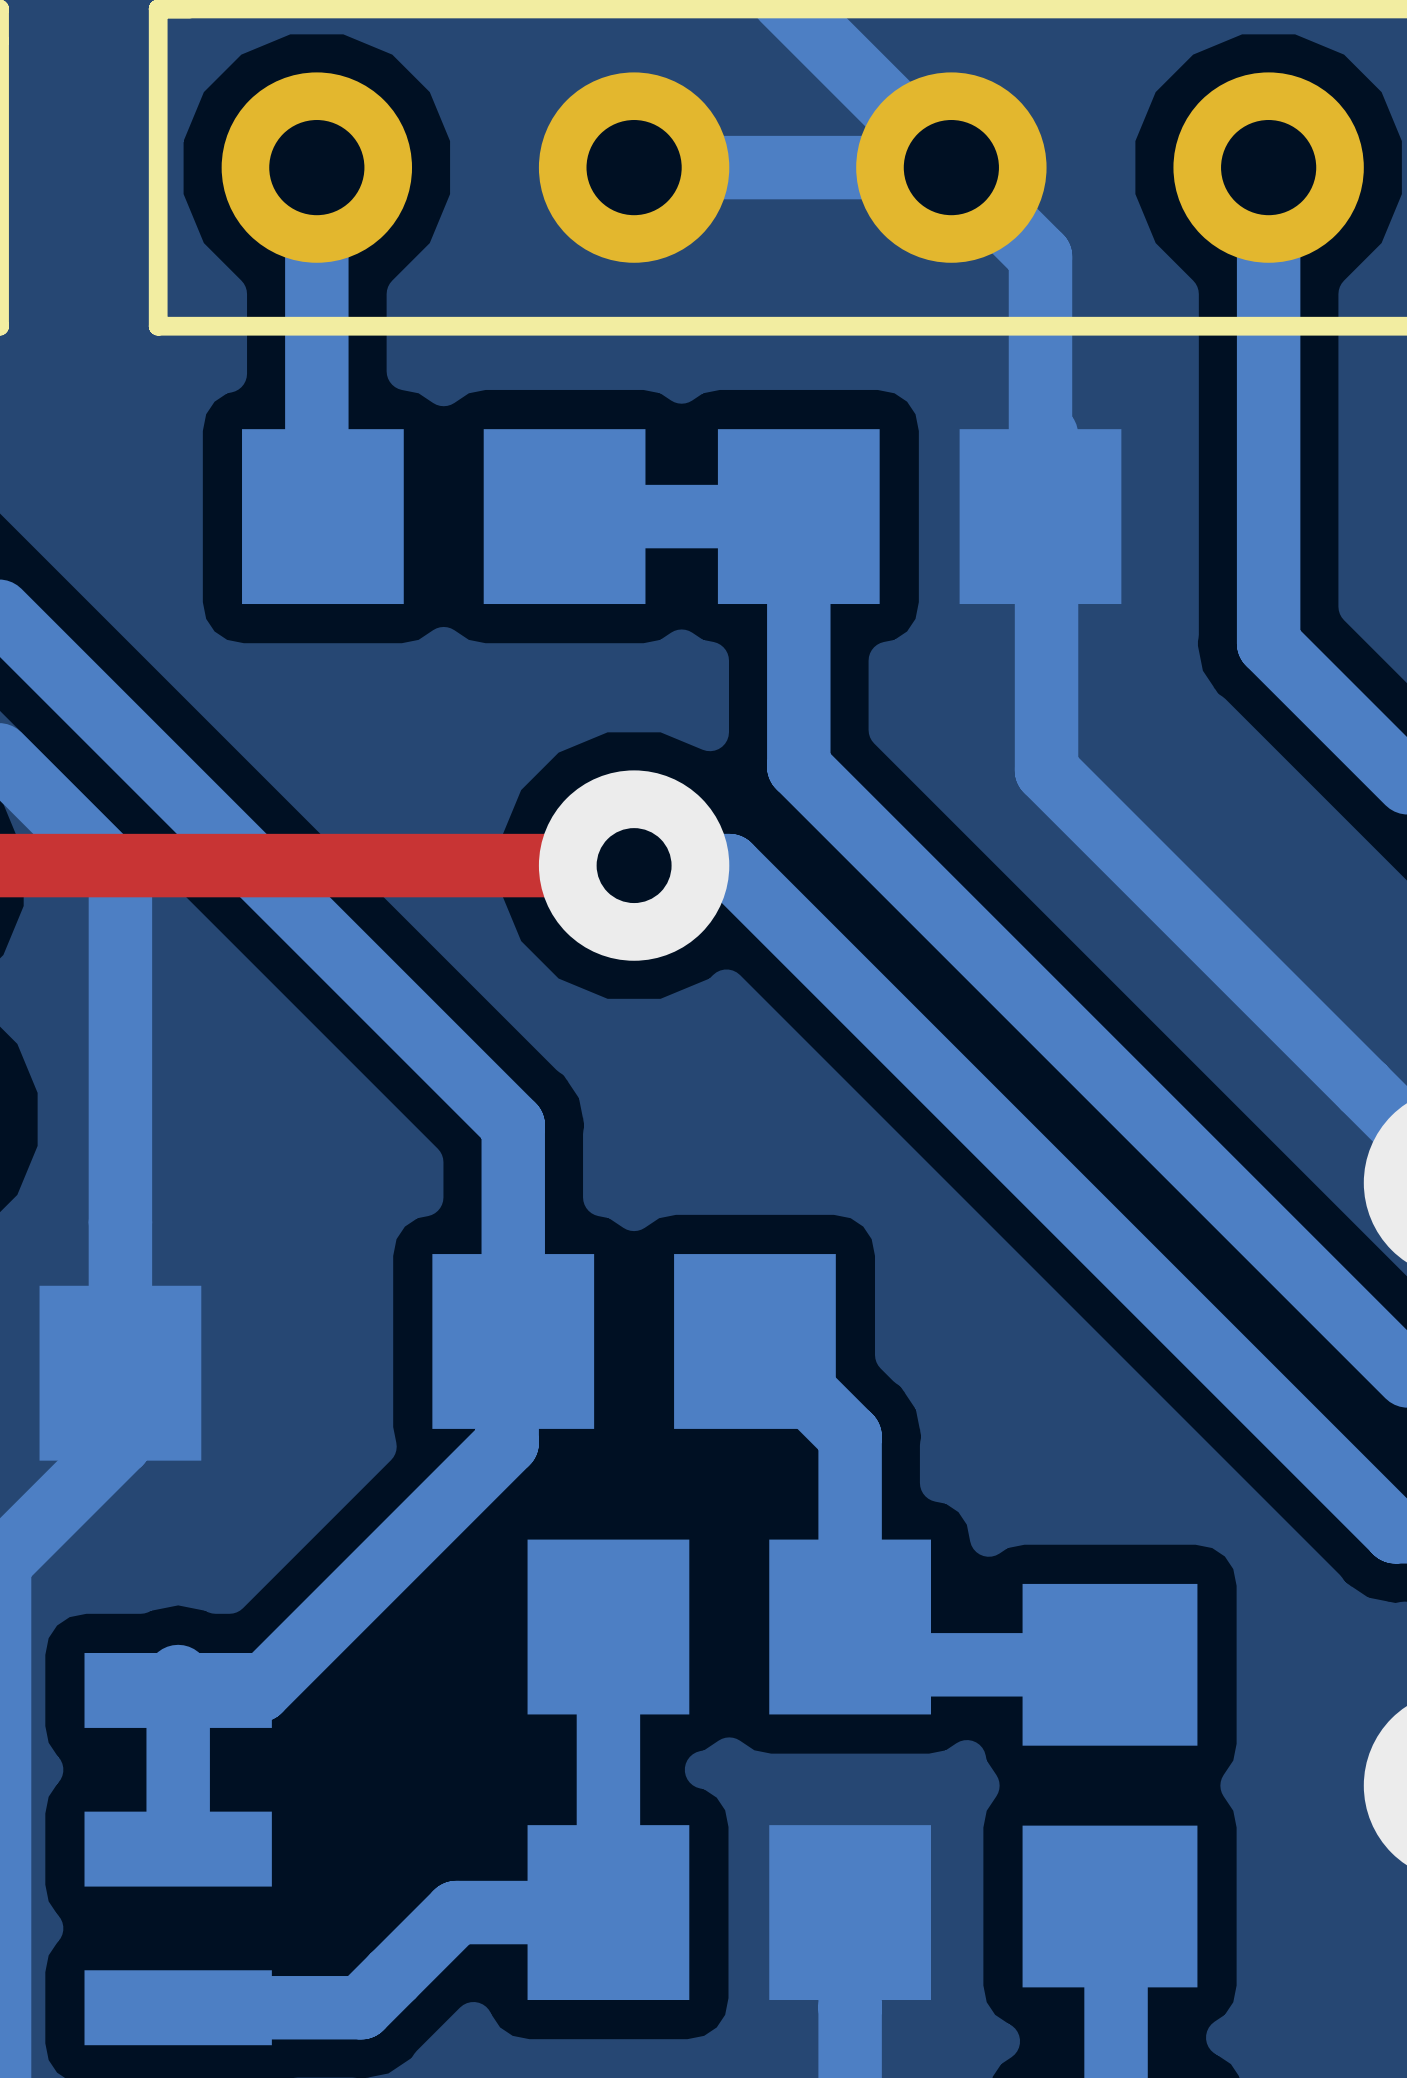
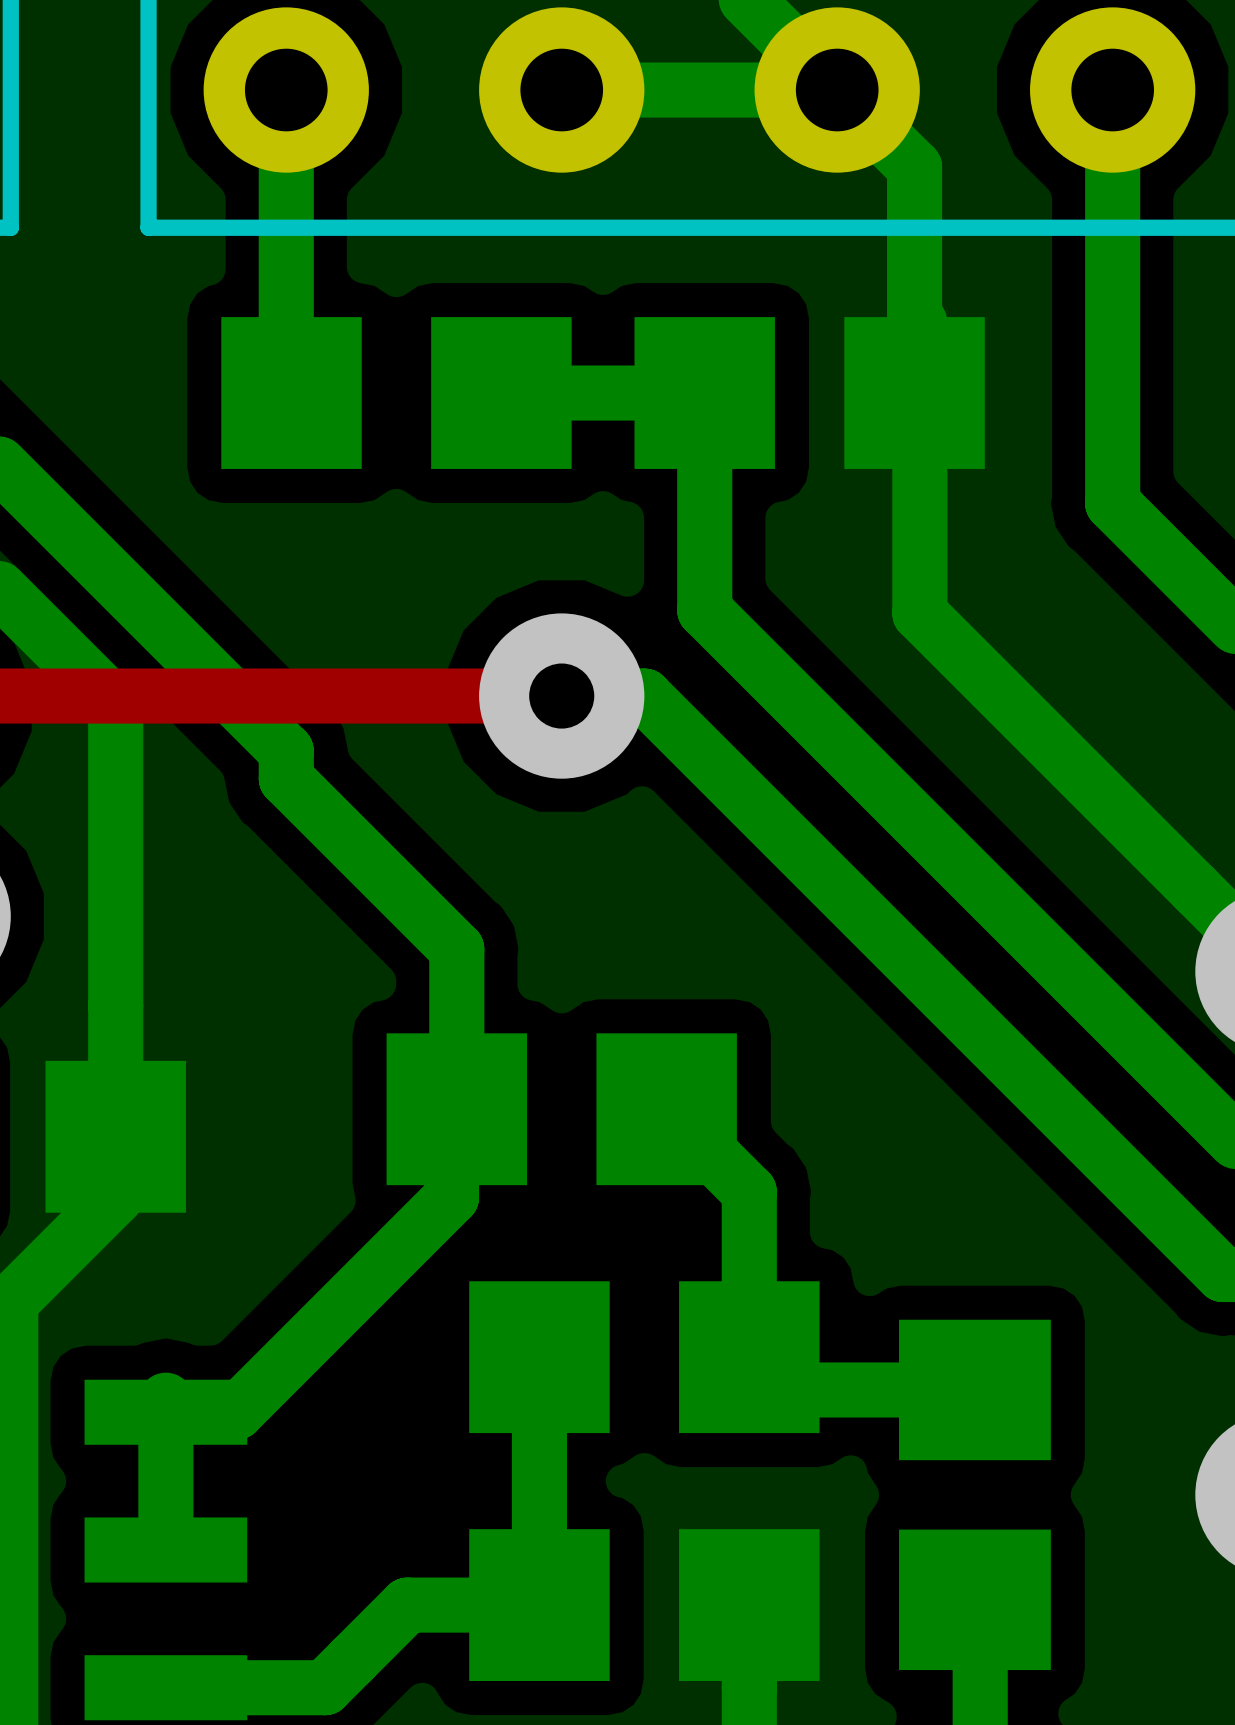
bottom track: (316, 929) (513, 1125) (513, 1157) -> (286, 751) (286, 778) (456, 949)

